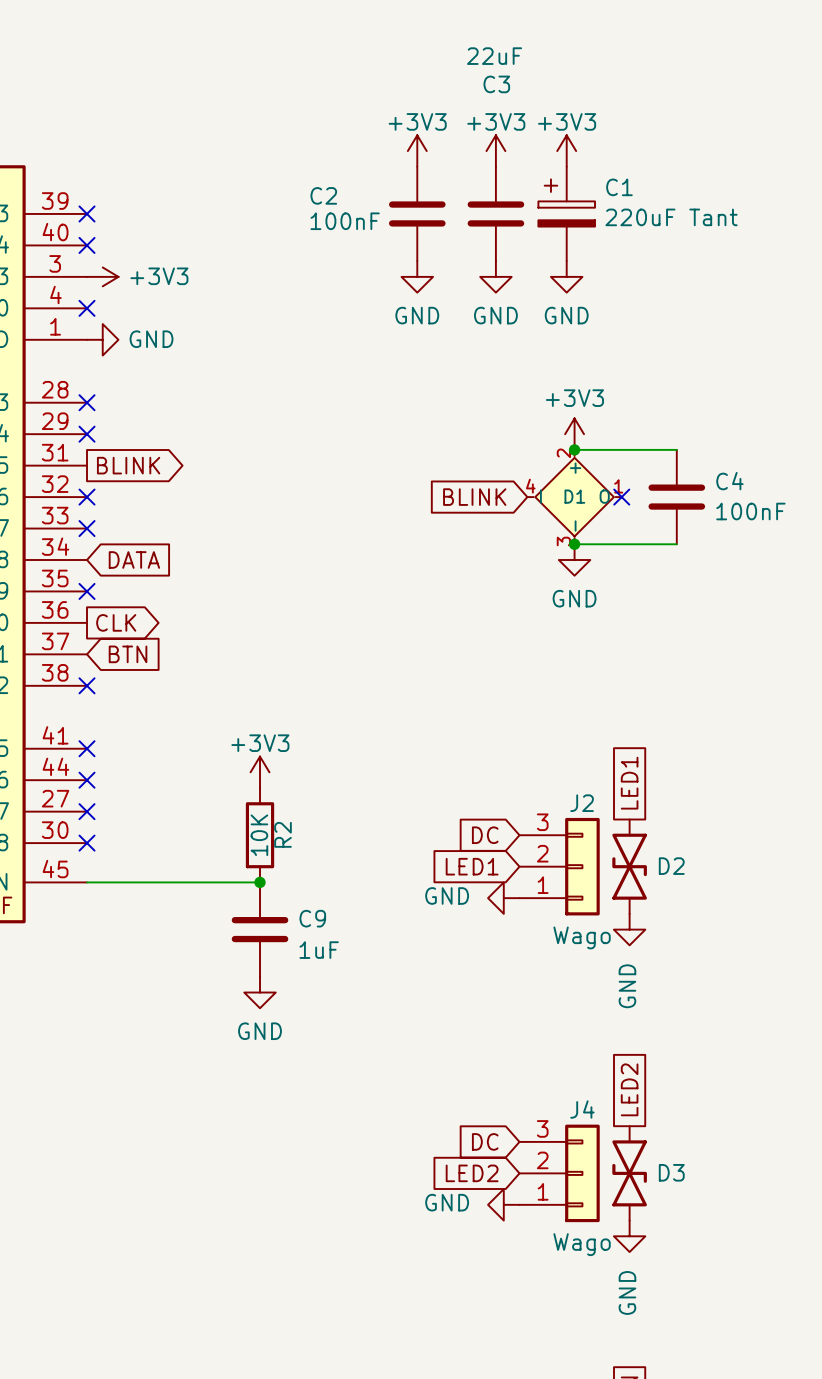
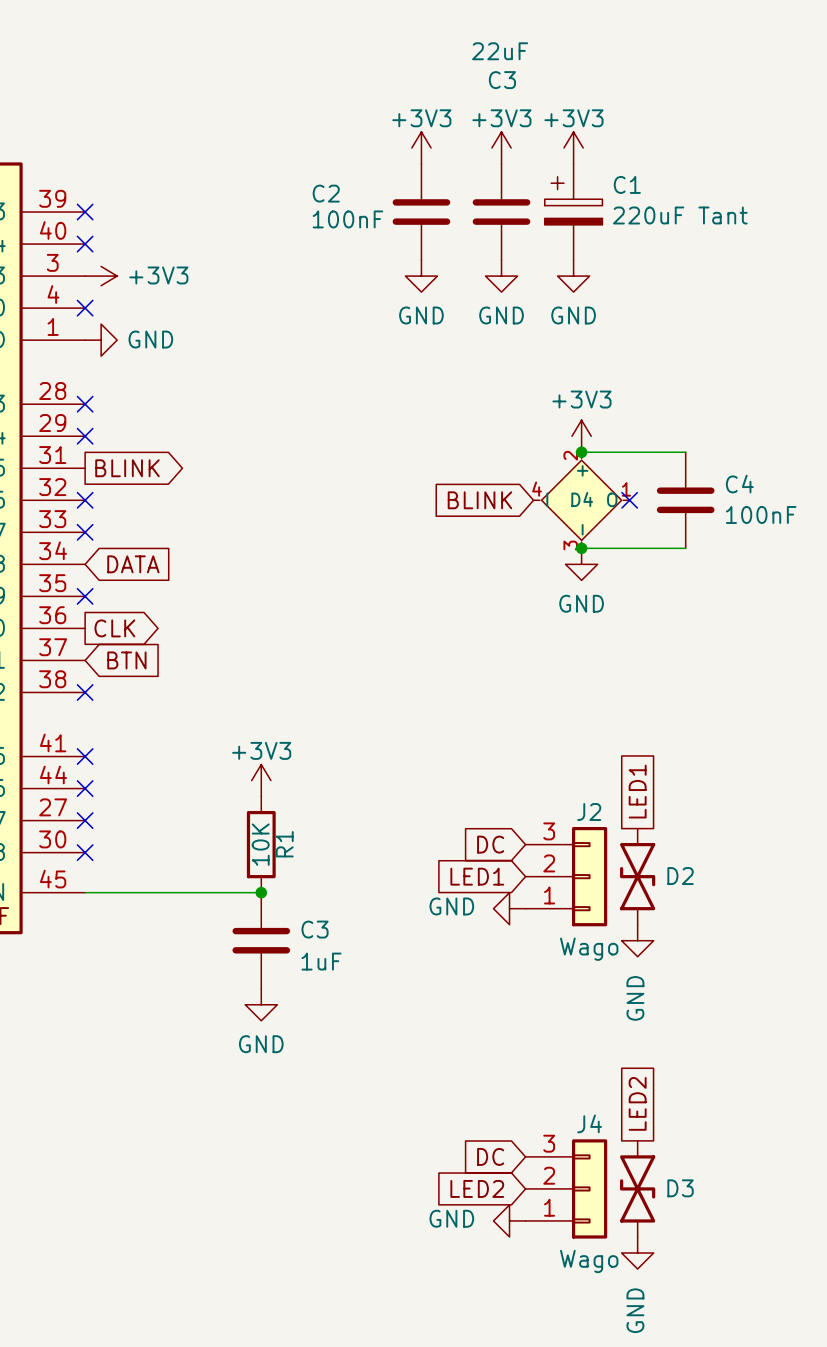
D1 name: D1 (574, 496) -> D4 (582, 499)
R2 name: R2 (283, 834) -> R1 (284, 844)
C9 name: C9 (312, 918) -> C3 (315, 929)

